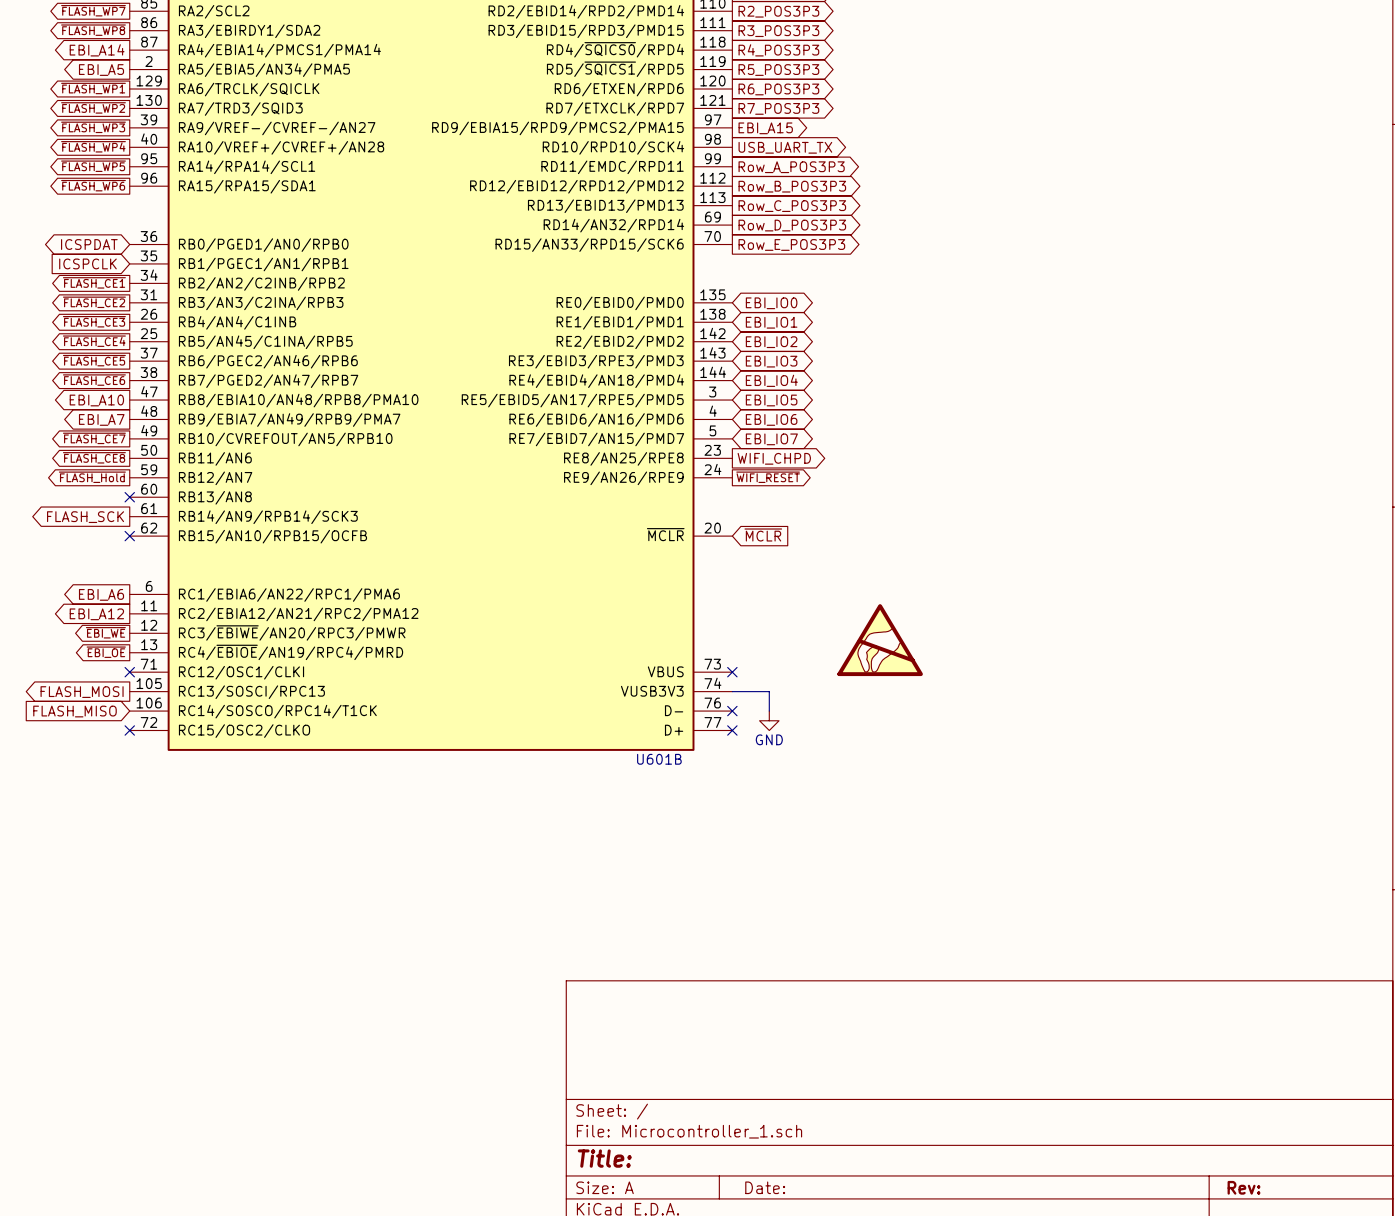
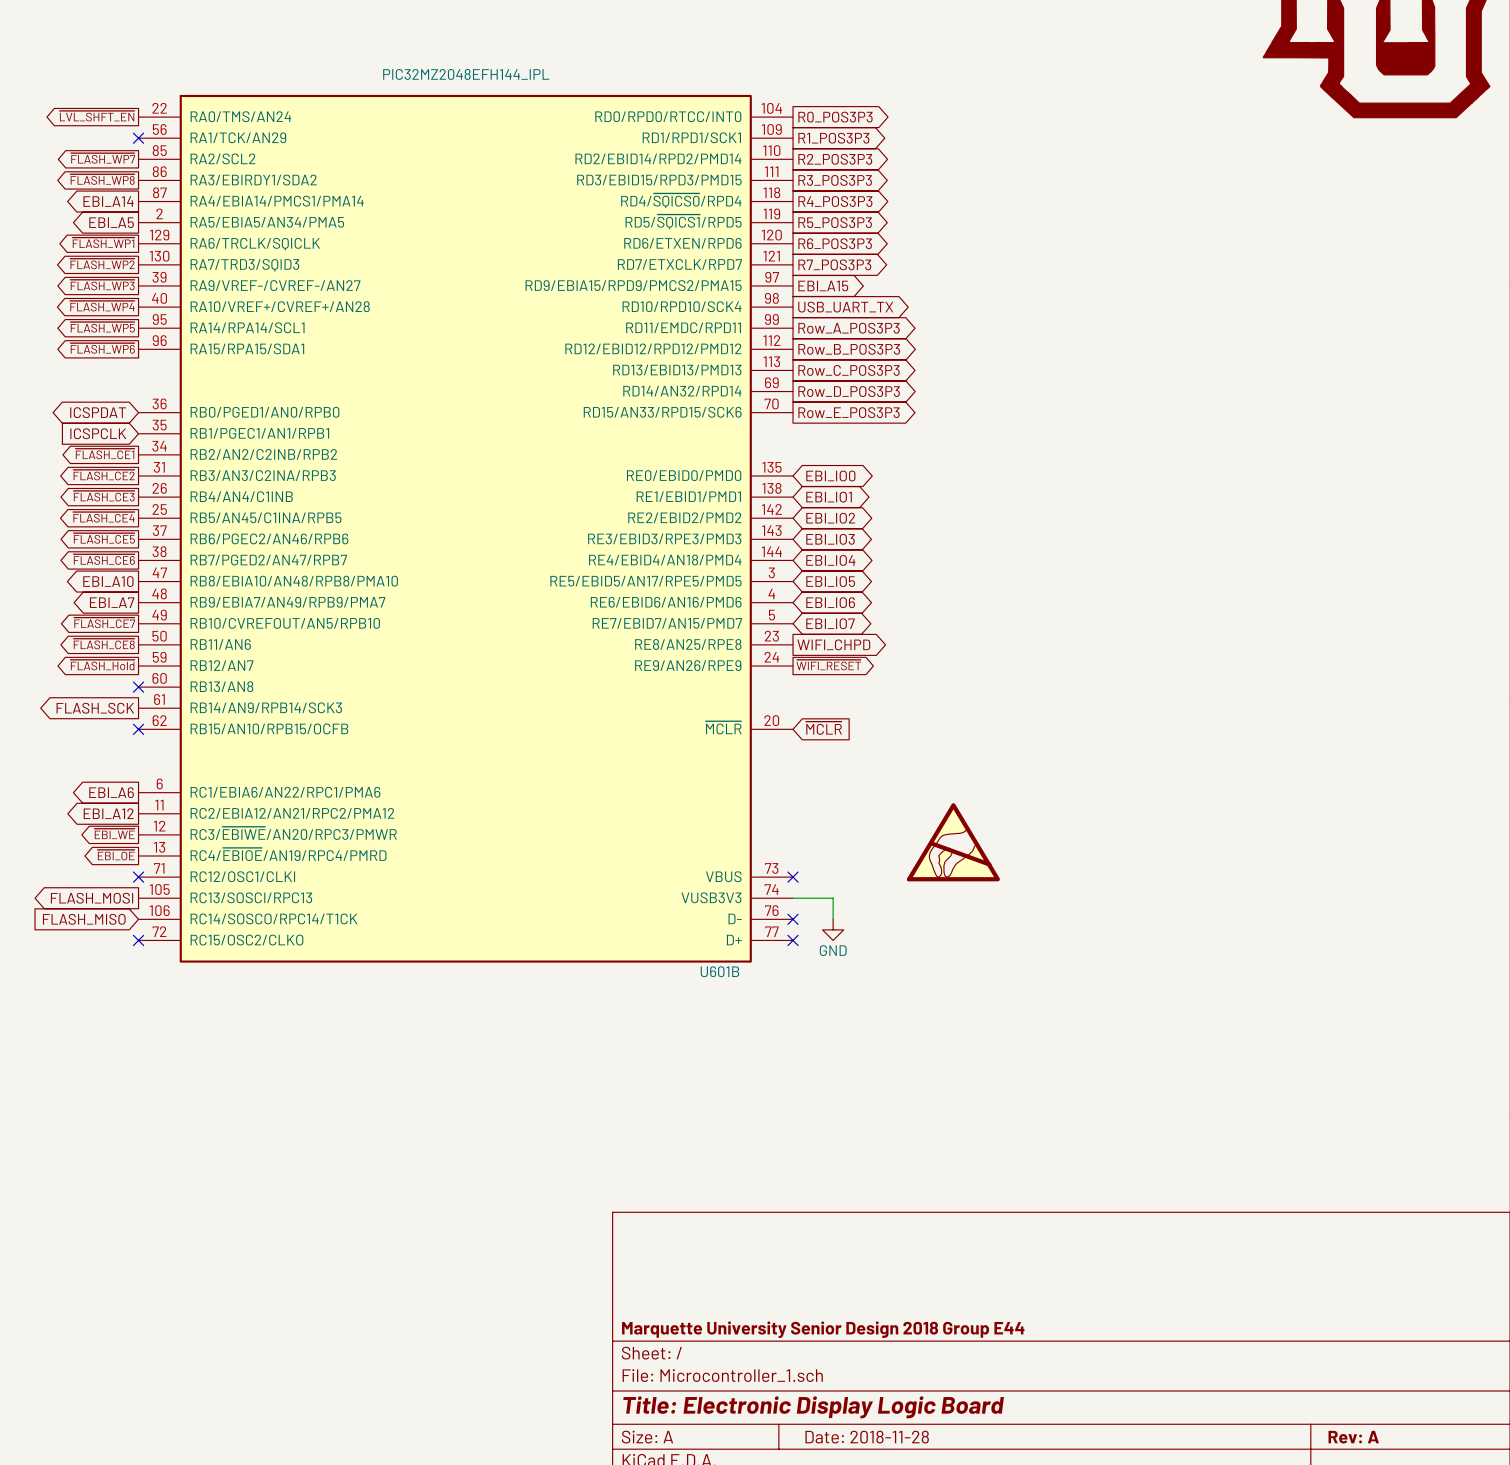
title block: none -> Marquette University Senior Design 2018 Group E44 (823, 1329)
title block: Title: (604, 1158) -> Title: Electronic Display Logic Board (813, 1407)
title block: Date: (765, 1187) -> Date: 2018-11-28 (867, 1437)
title block: Rev: (1244, 1187) -> Rev: A (1353, 1437)

